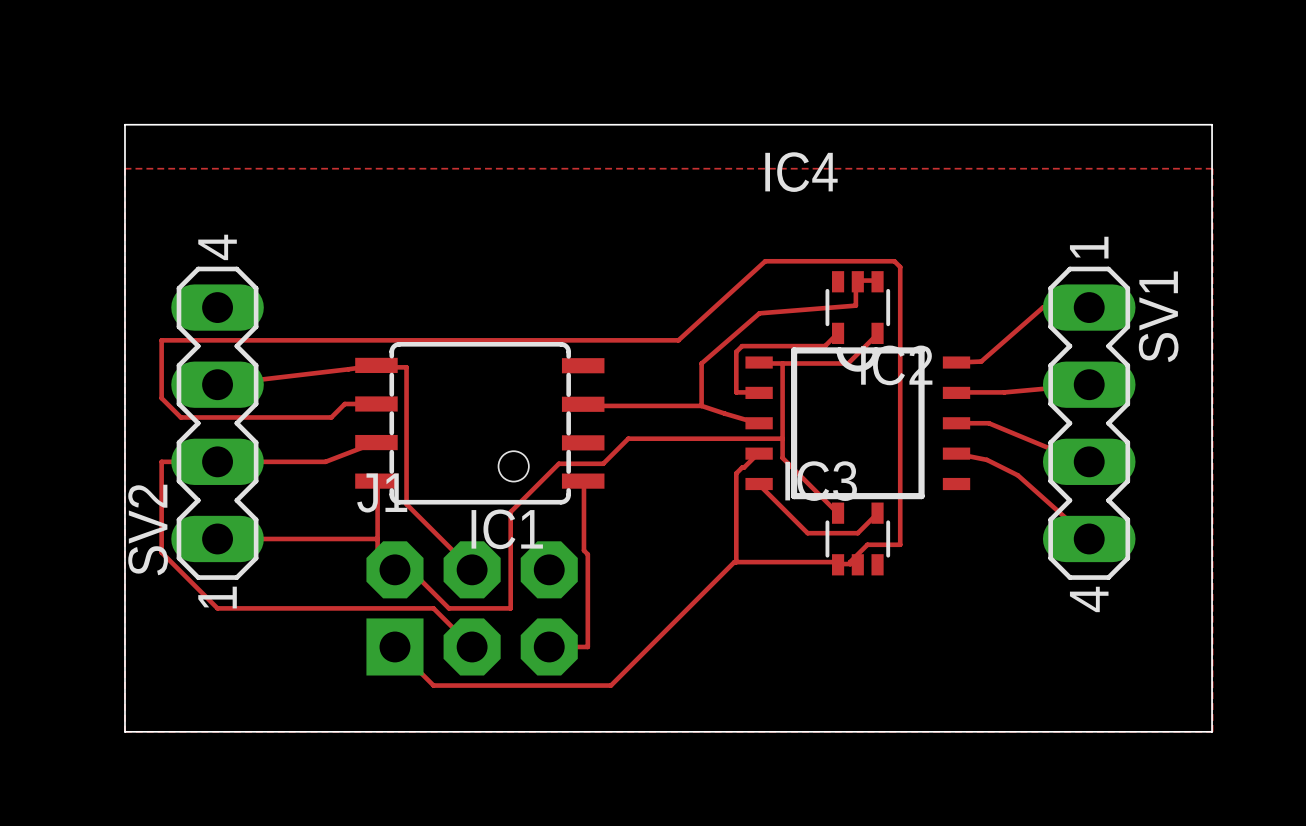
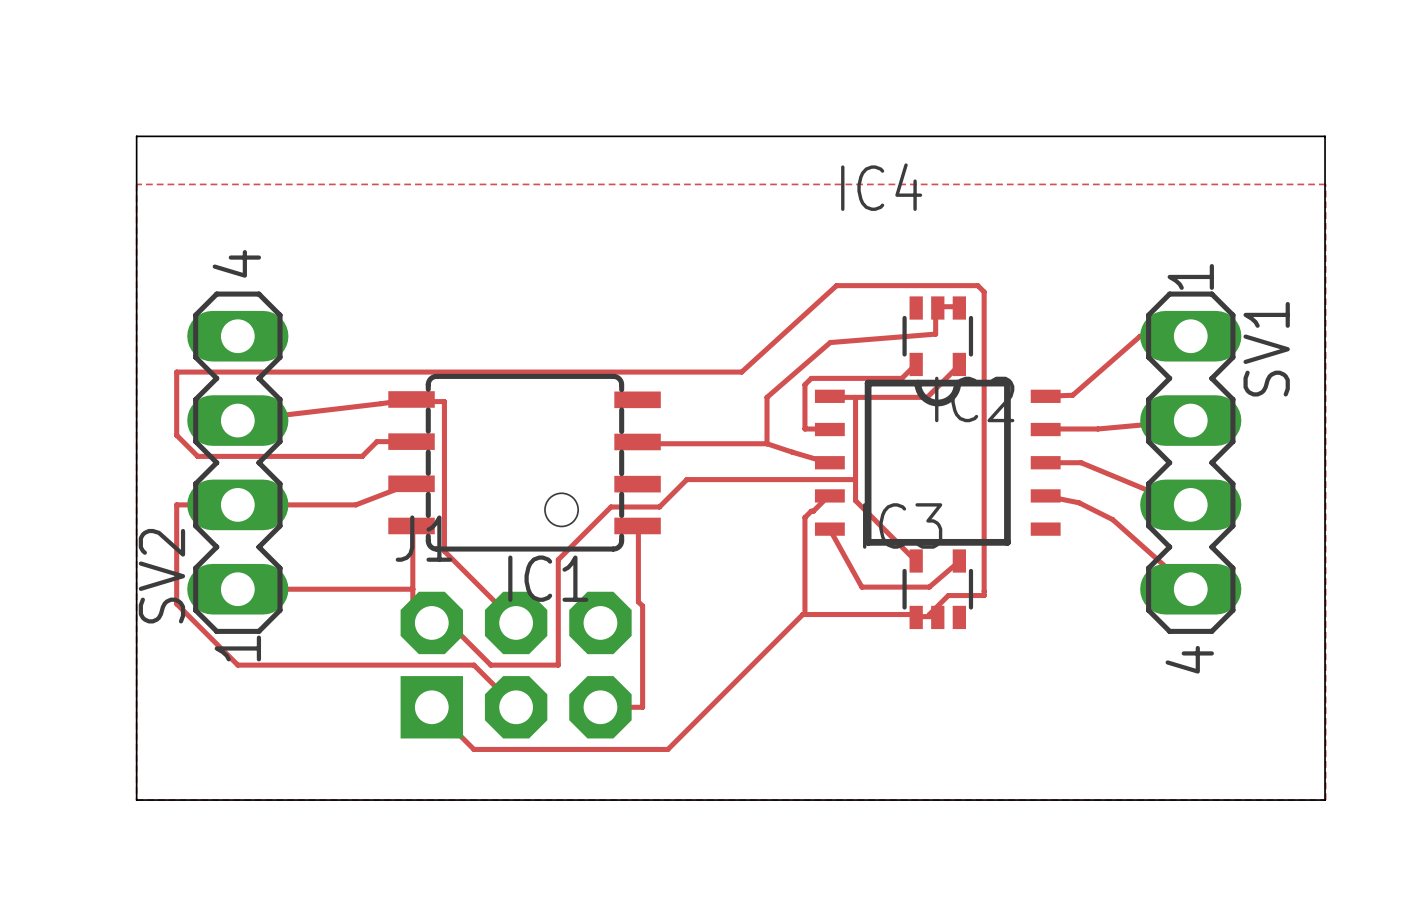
track: (759, 484) (807, 533) (857, 533) (877, 513) -> (830, 530) (861, 587) (929, 587) (958, 561)

